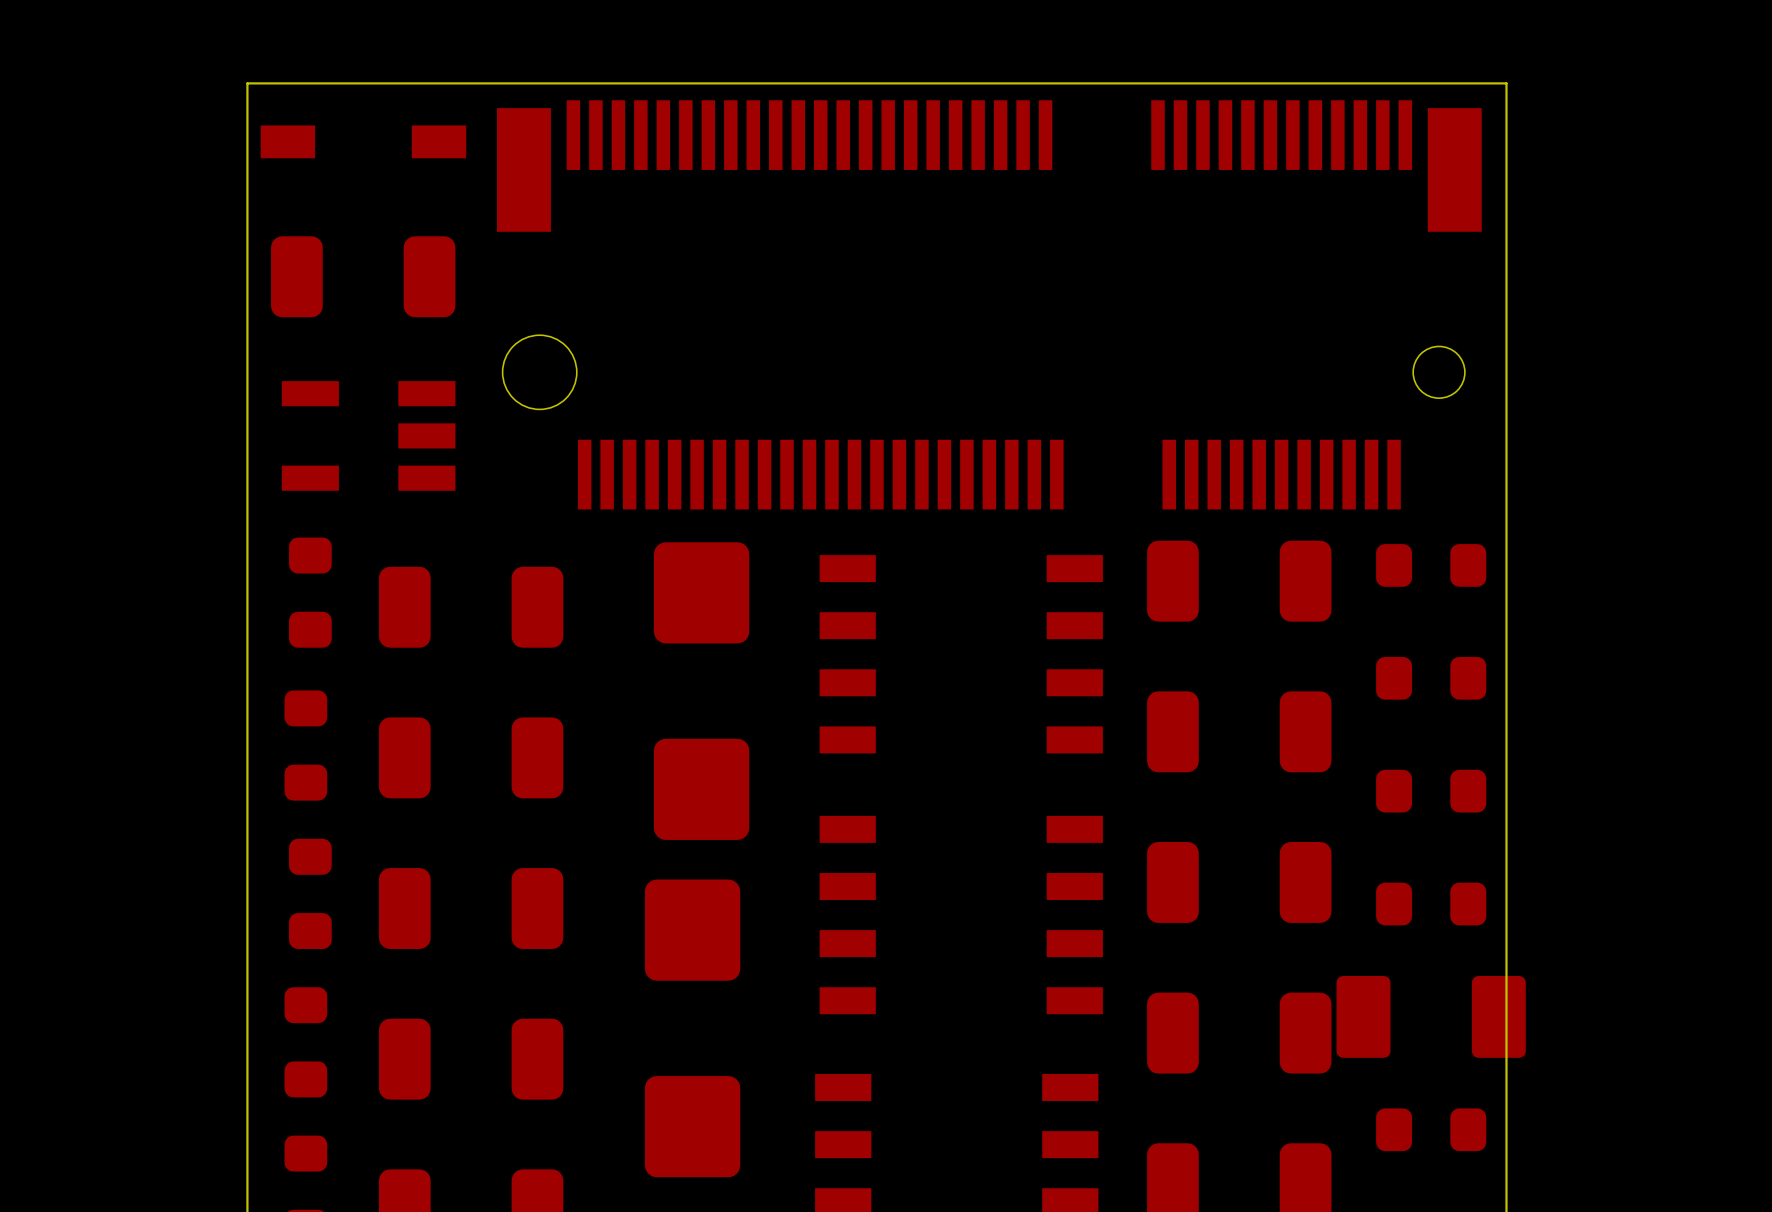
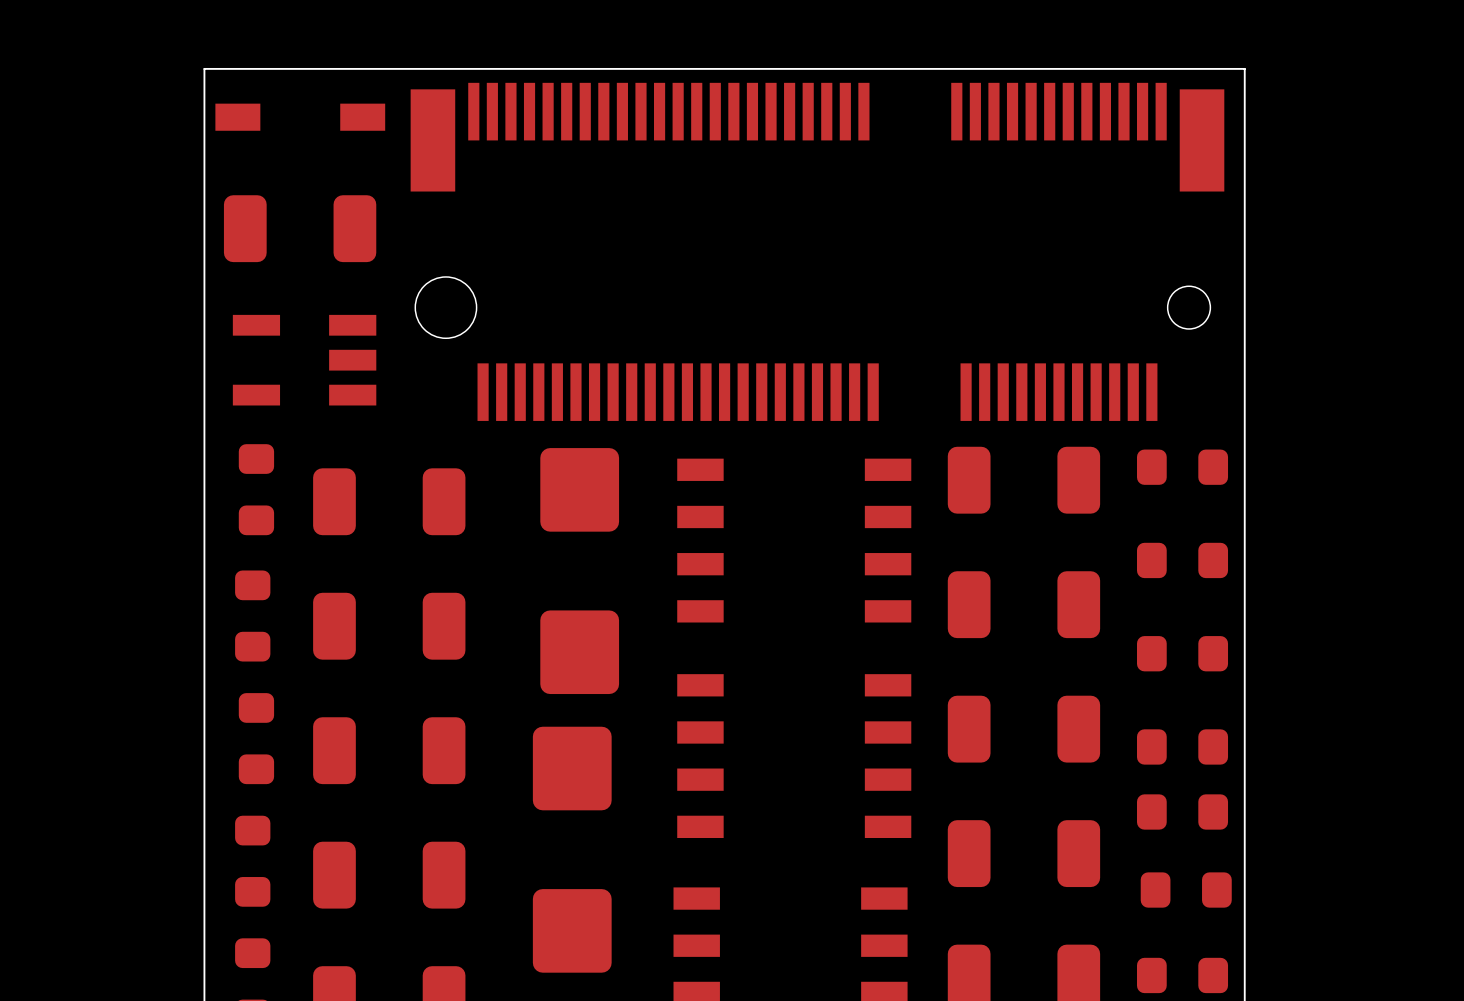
part: none -> (1182, 811)
part: (1431, 1016) -> none
part: none -> (1186, 890)
part: (1431, 1129) -> none
part: none -> (1182, 975)

